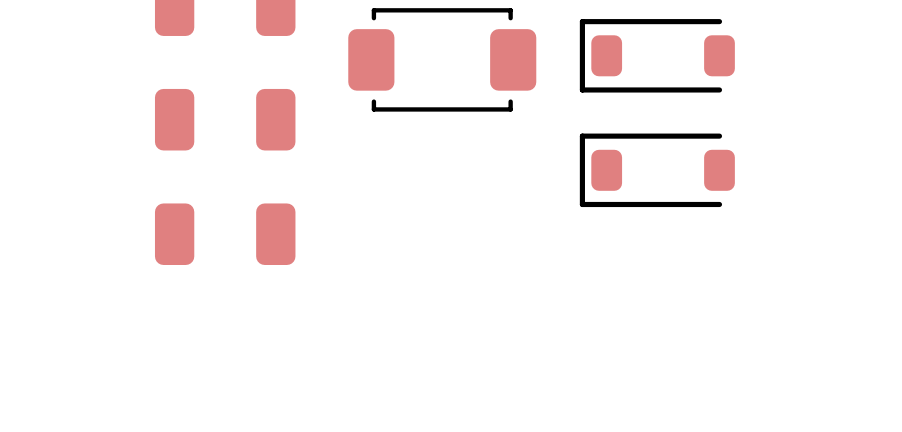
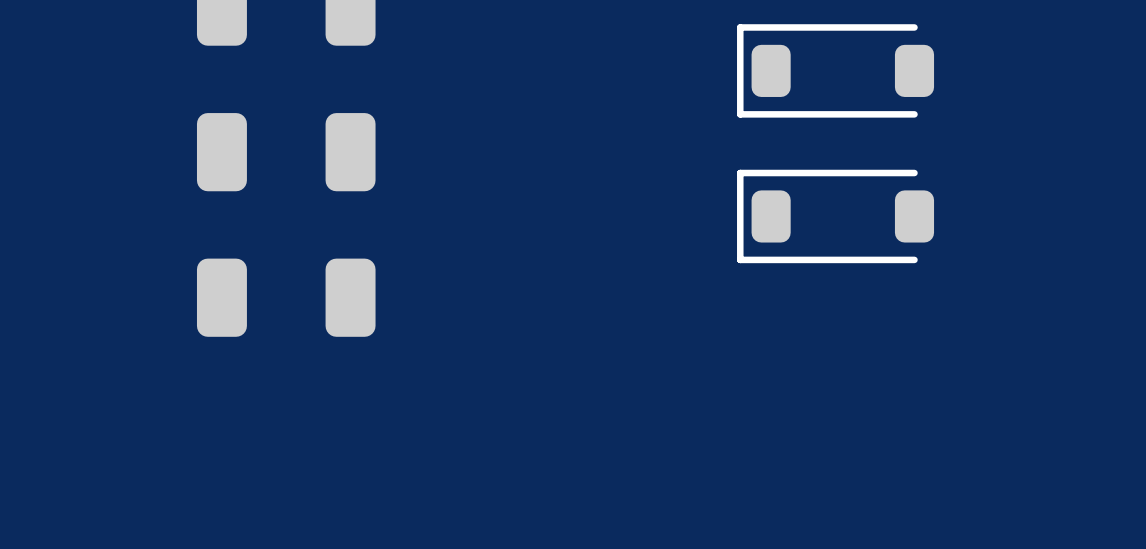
part: (442, 59) -> none

